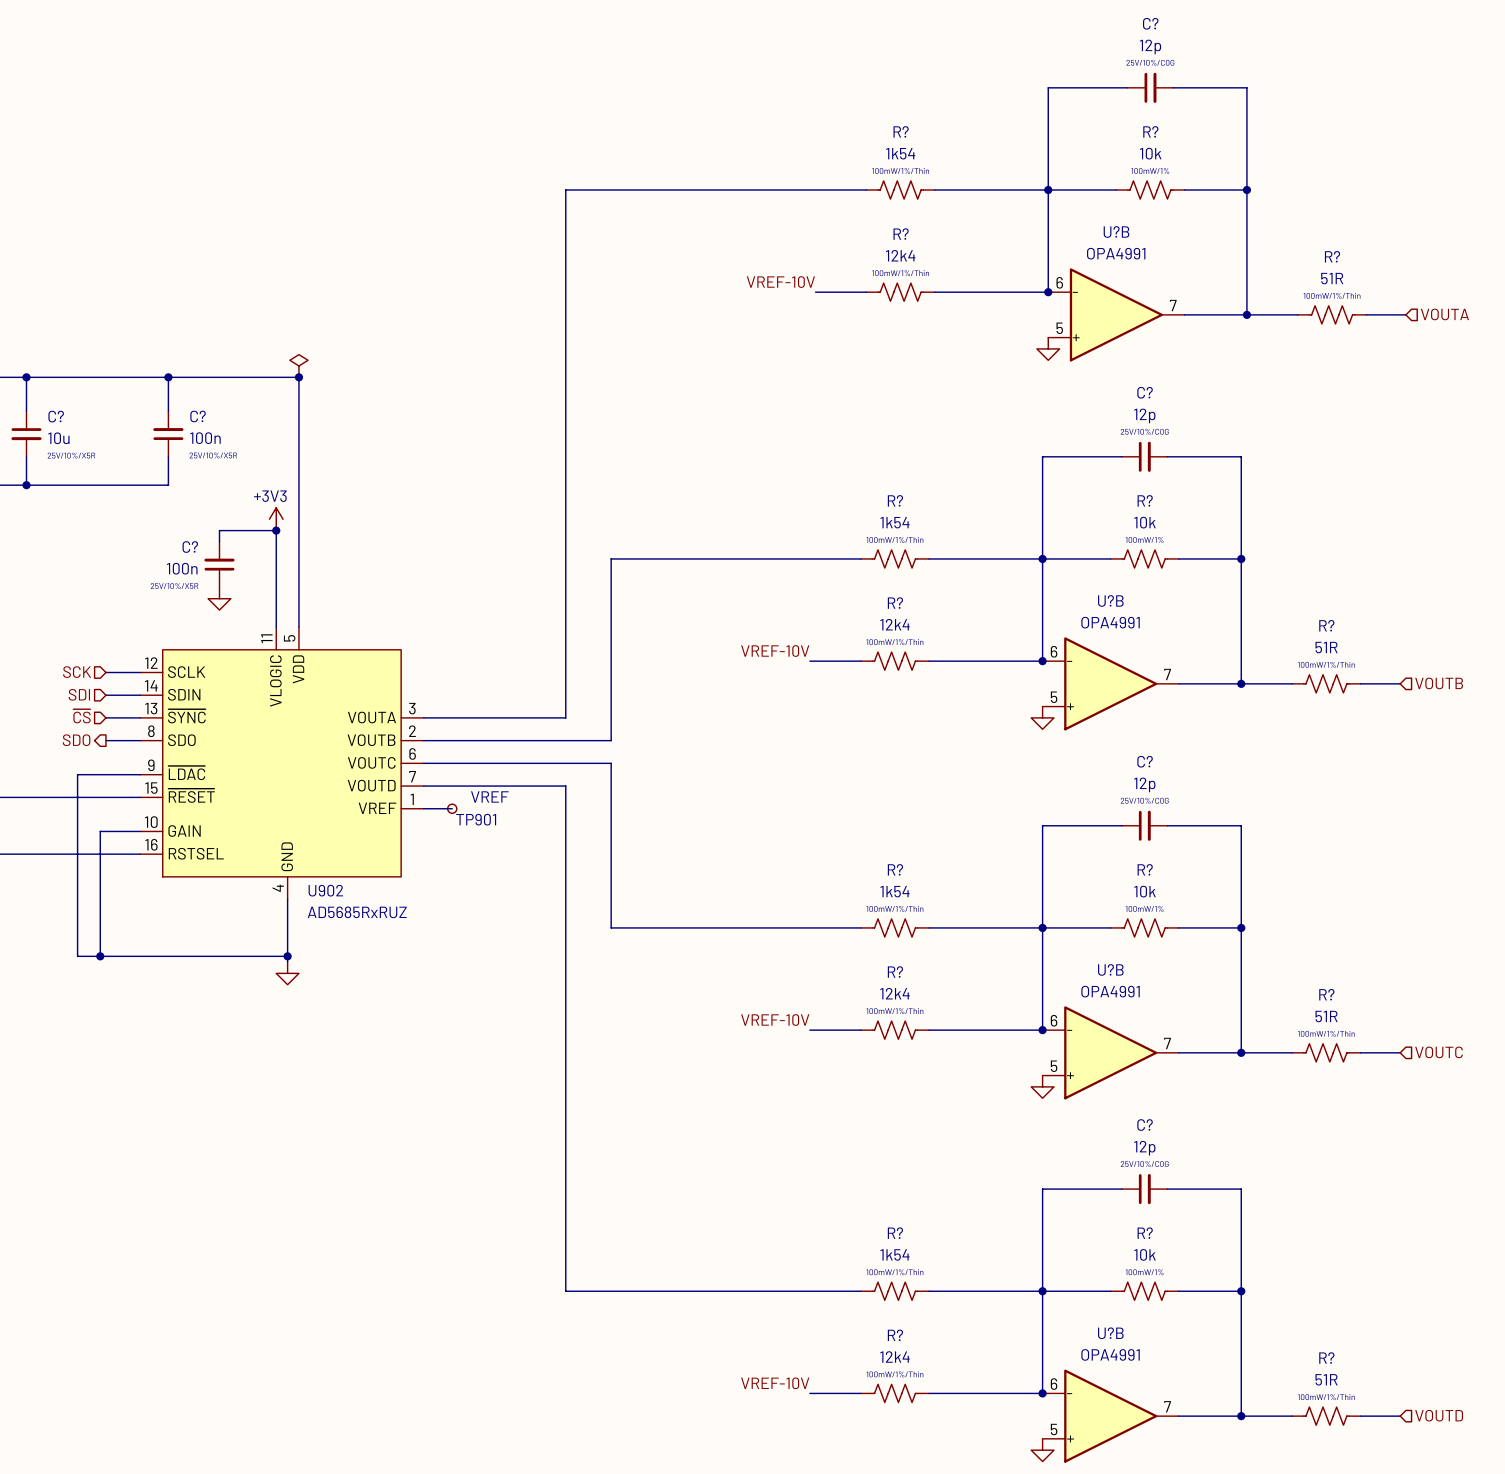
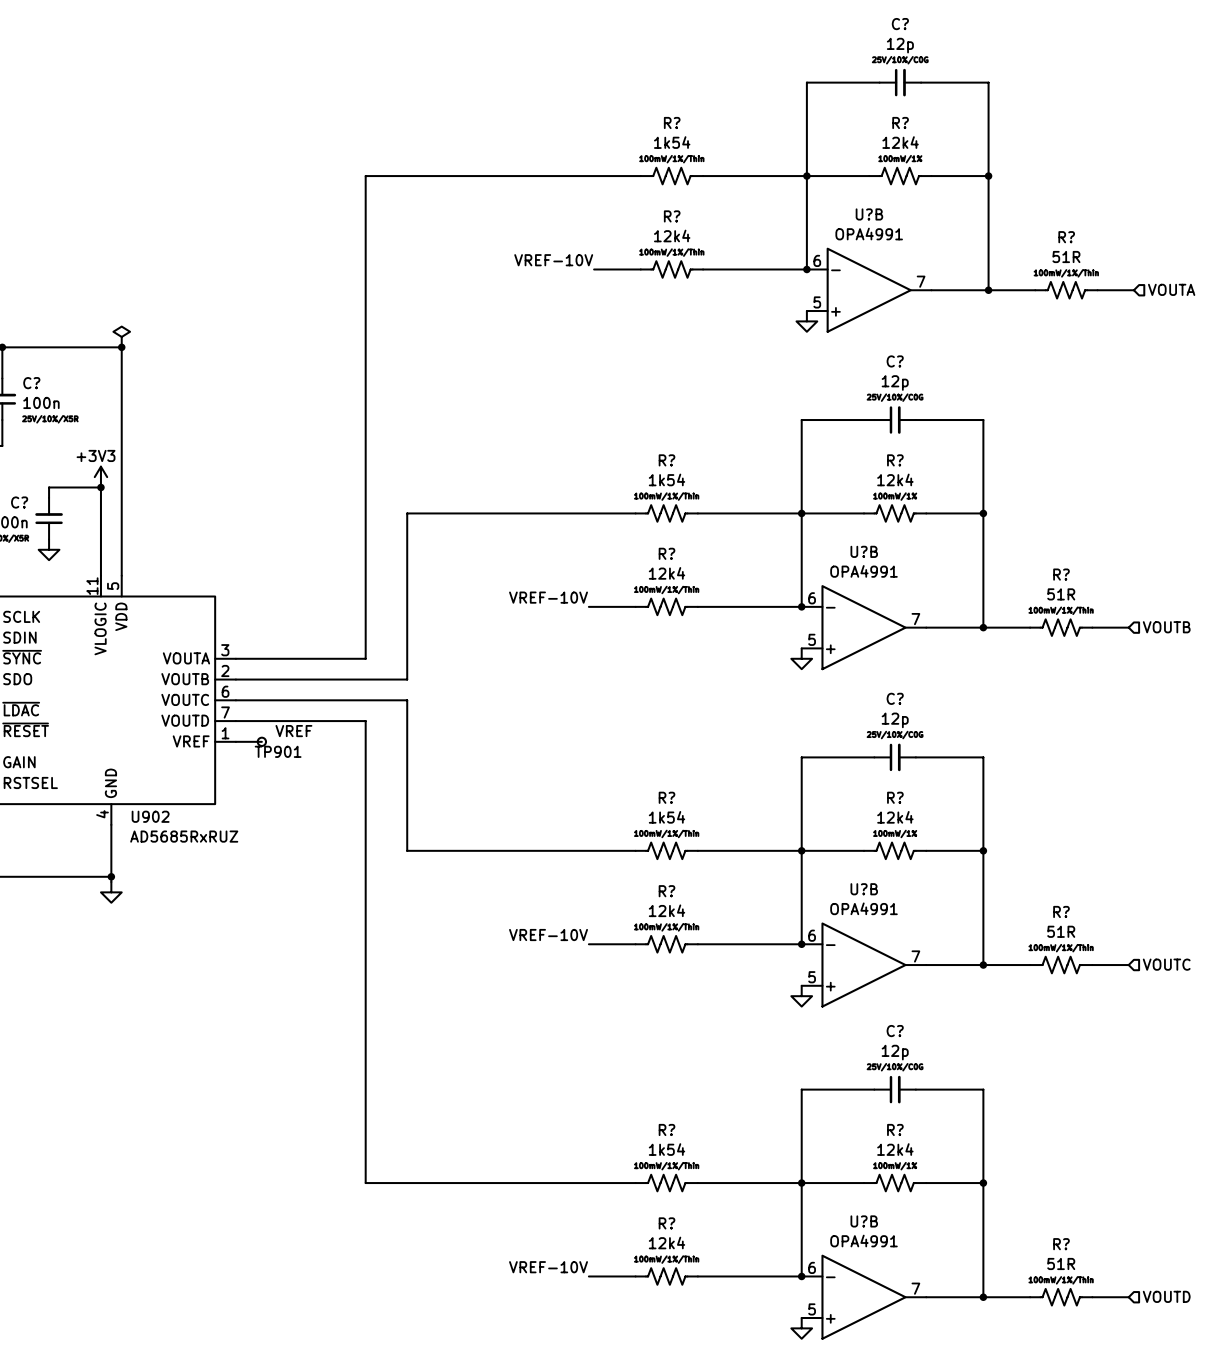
R? value: 10k (1150, 153) -> 12k4 (900, 142)
R? value: 10k (1144, 522) -> 12k4 (895, 479)
R? value: 10k (1144, 891) -> 12k4 (895, 817)
R? value: 10k (1144, 1254) -> 12k4 (895, 1149)

